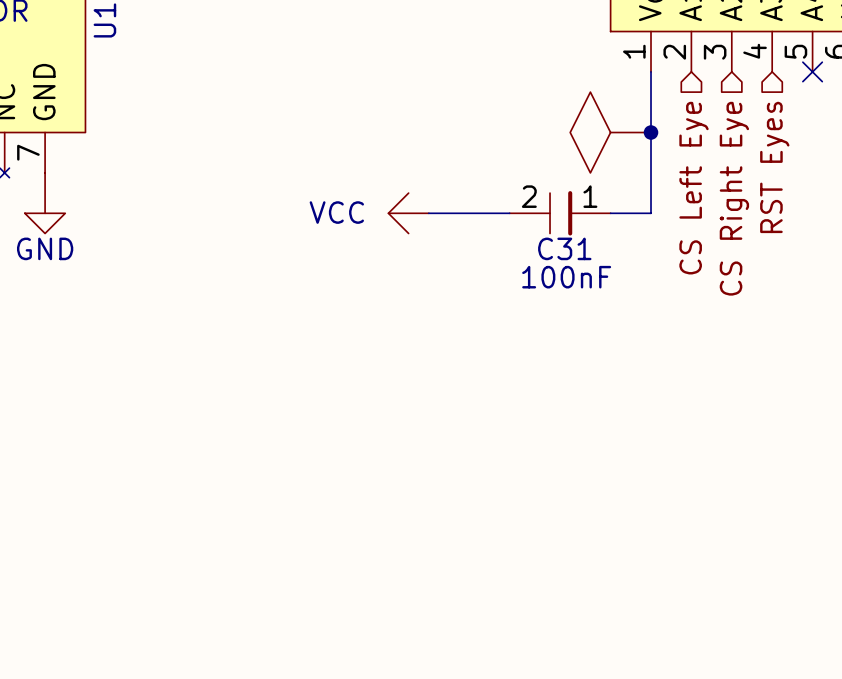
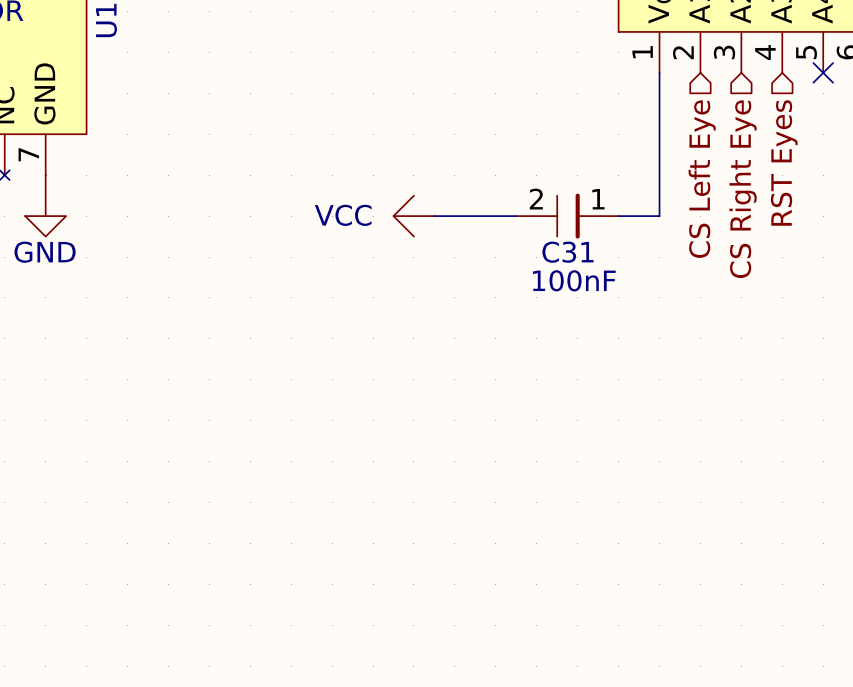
power symbol: (610, 132) -> none
junction: (651, 132) -> none

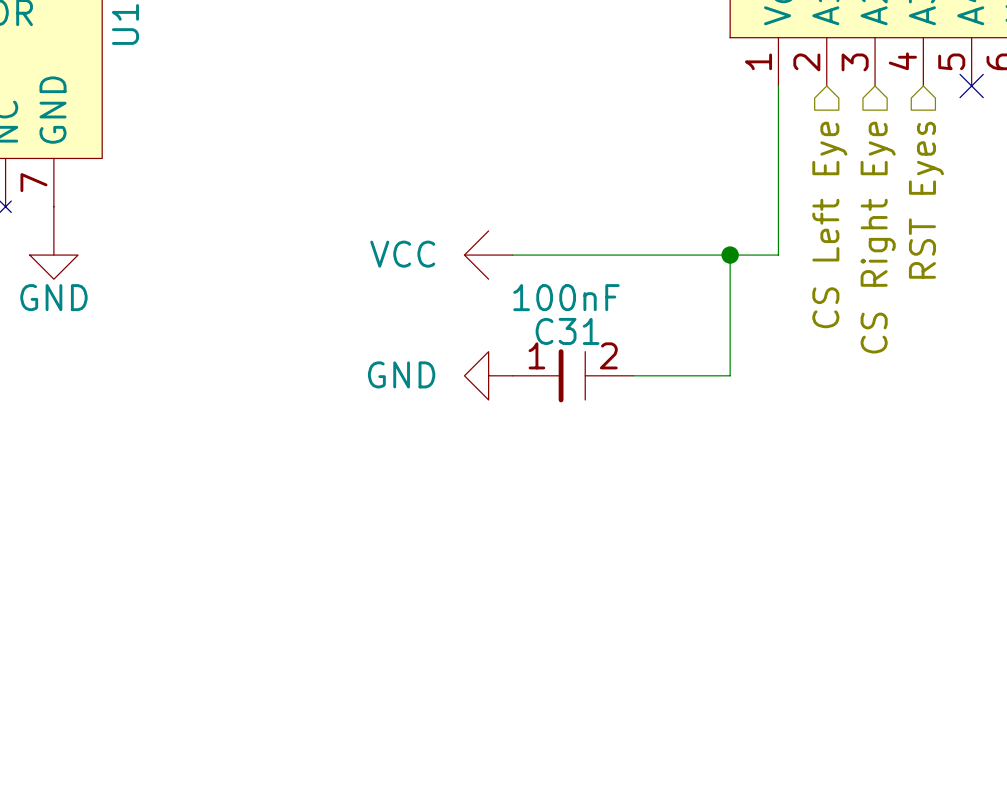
wire: none -> (609, 255) (730, 255) (730, 375) (633, 375)
C31 position: (567, 216) -> (573, 375)
C31 rotation: 0° (568, 216) -> 180° (571, 375)
junction: none -> (730, 255)
power symbol: none -> GND (488, 375)

